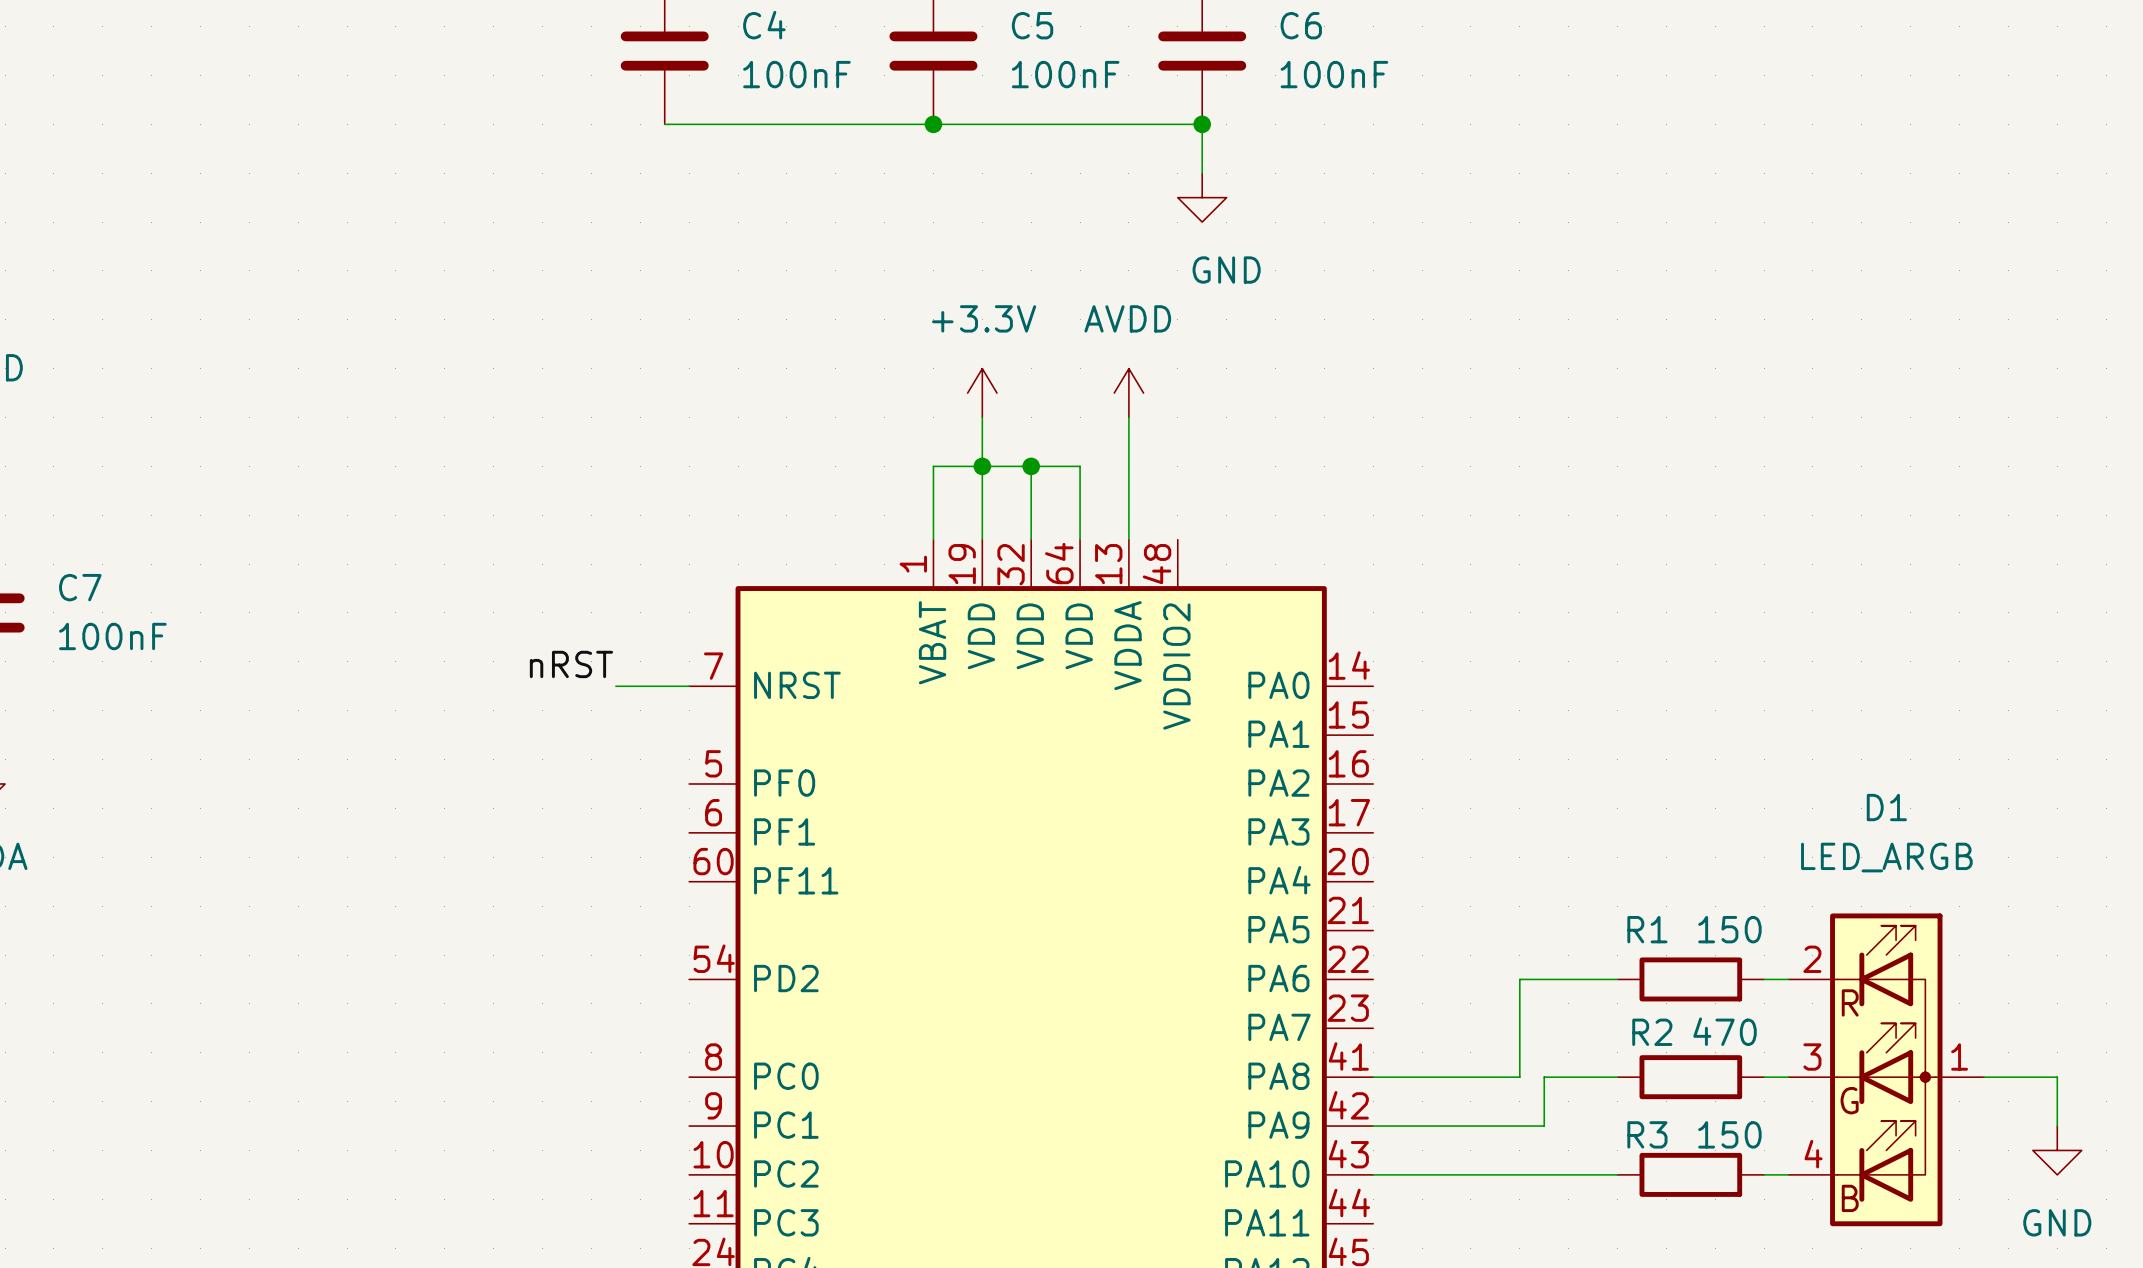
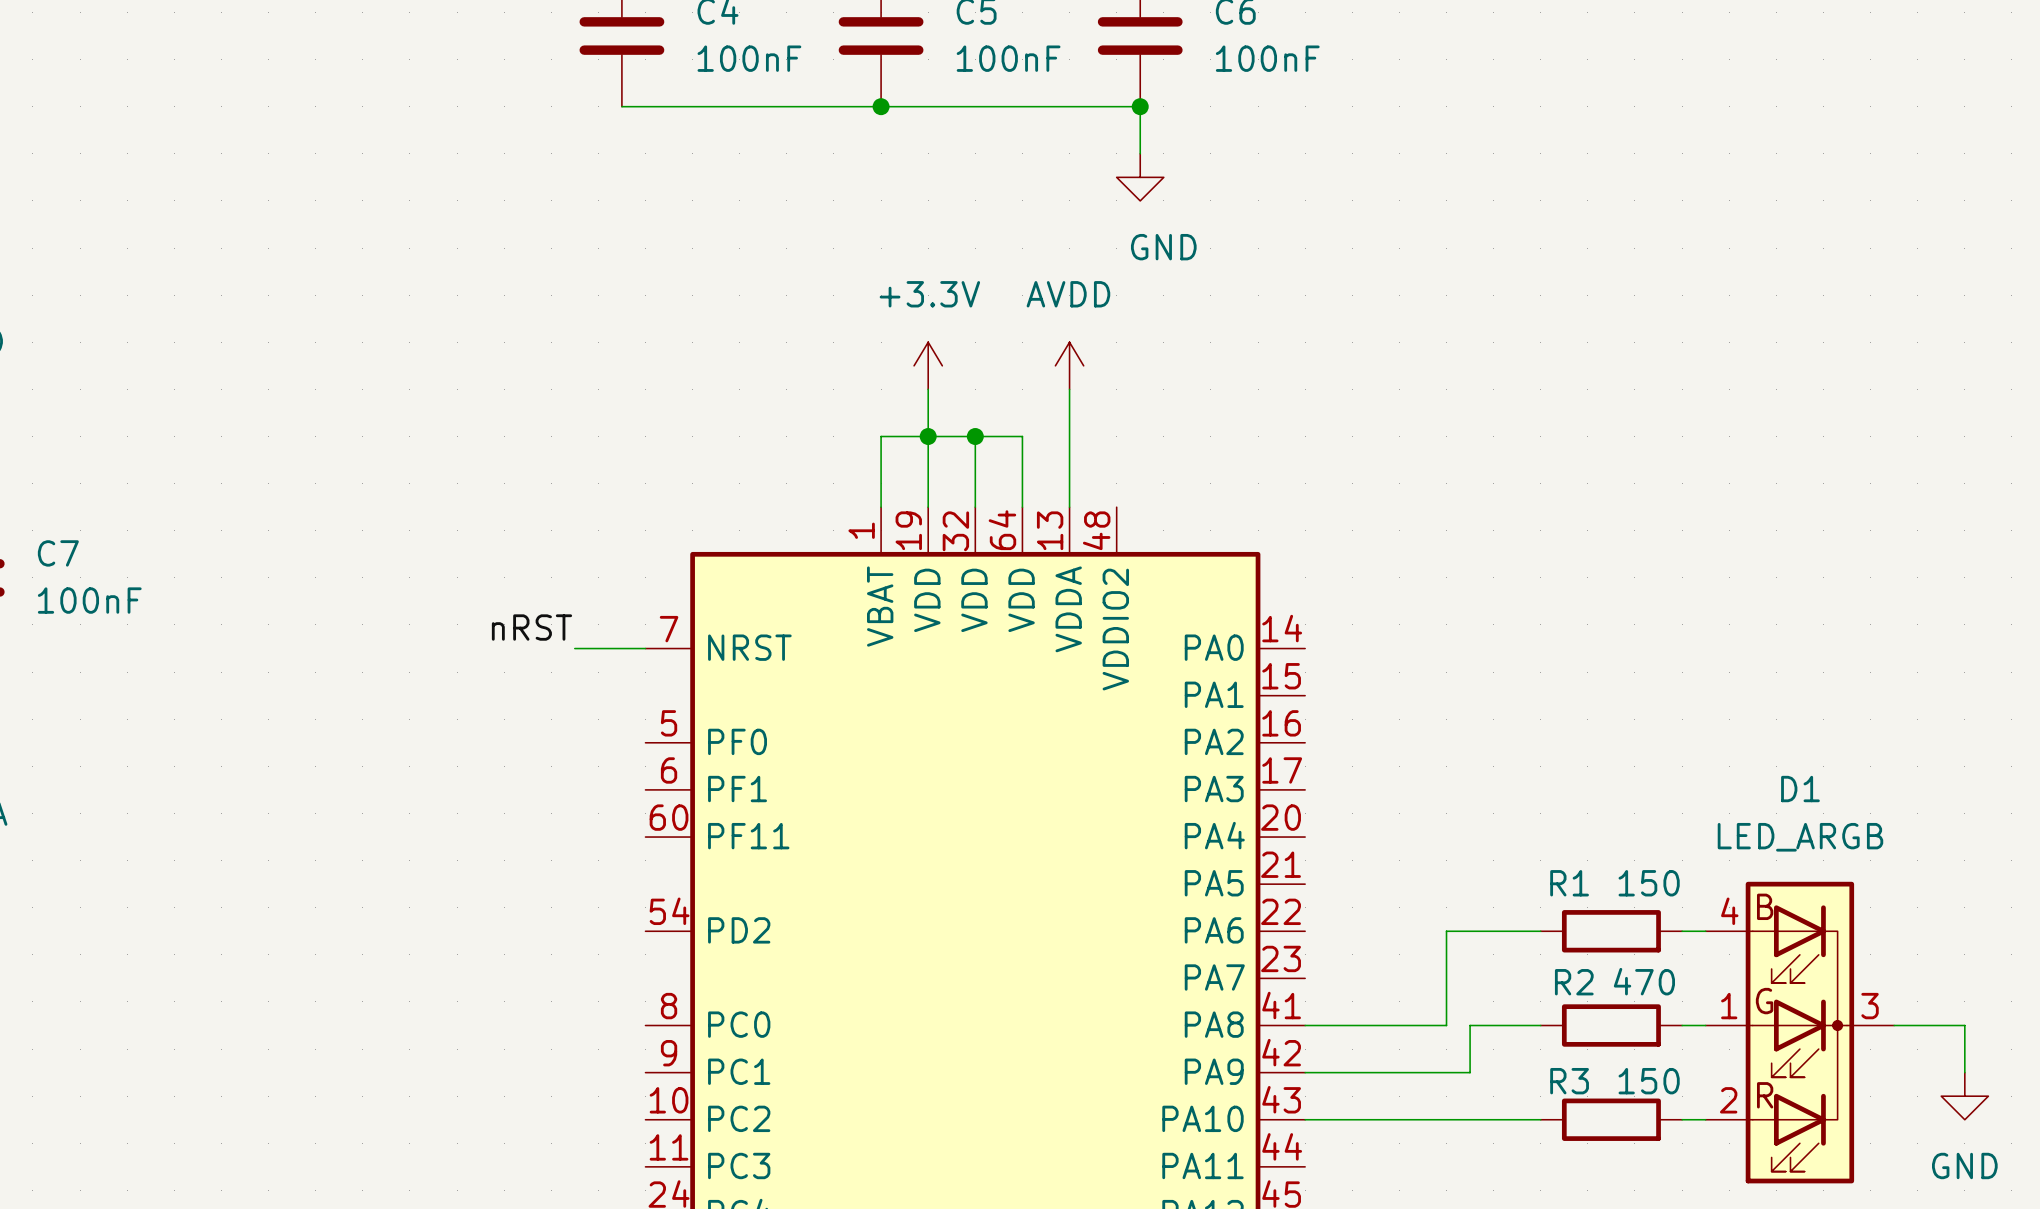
D1 symbol: [1788, 913, 1985, 1227] -> [1705, 881, 1895, 1184]

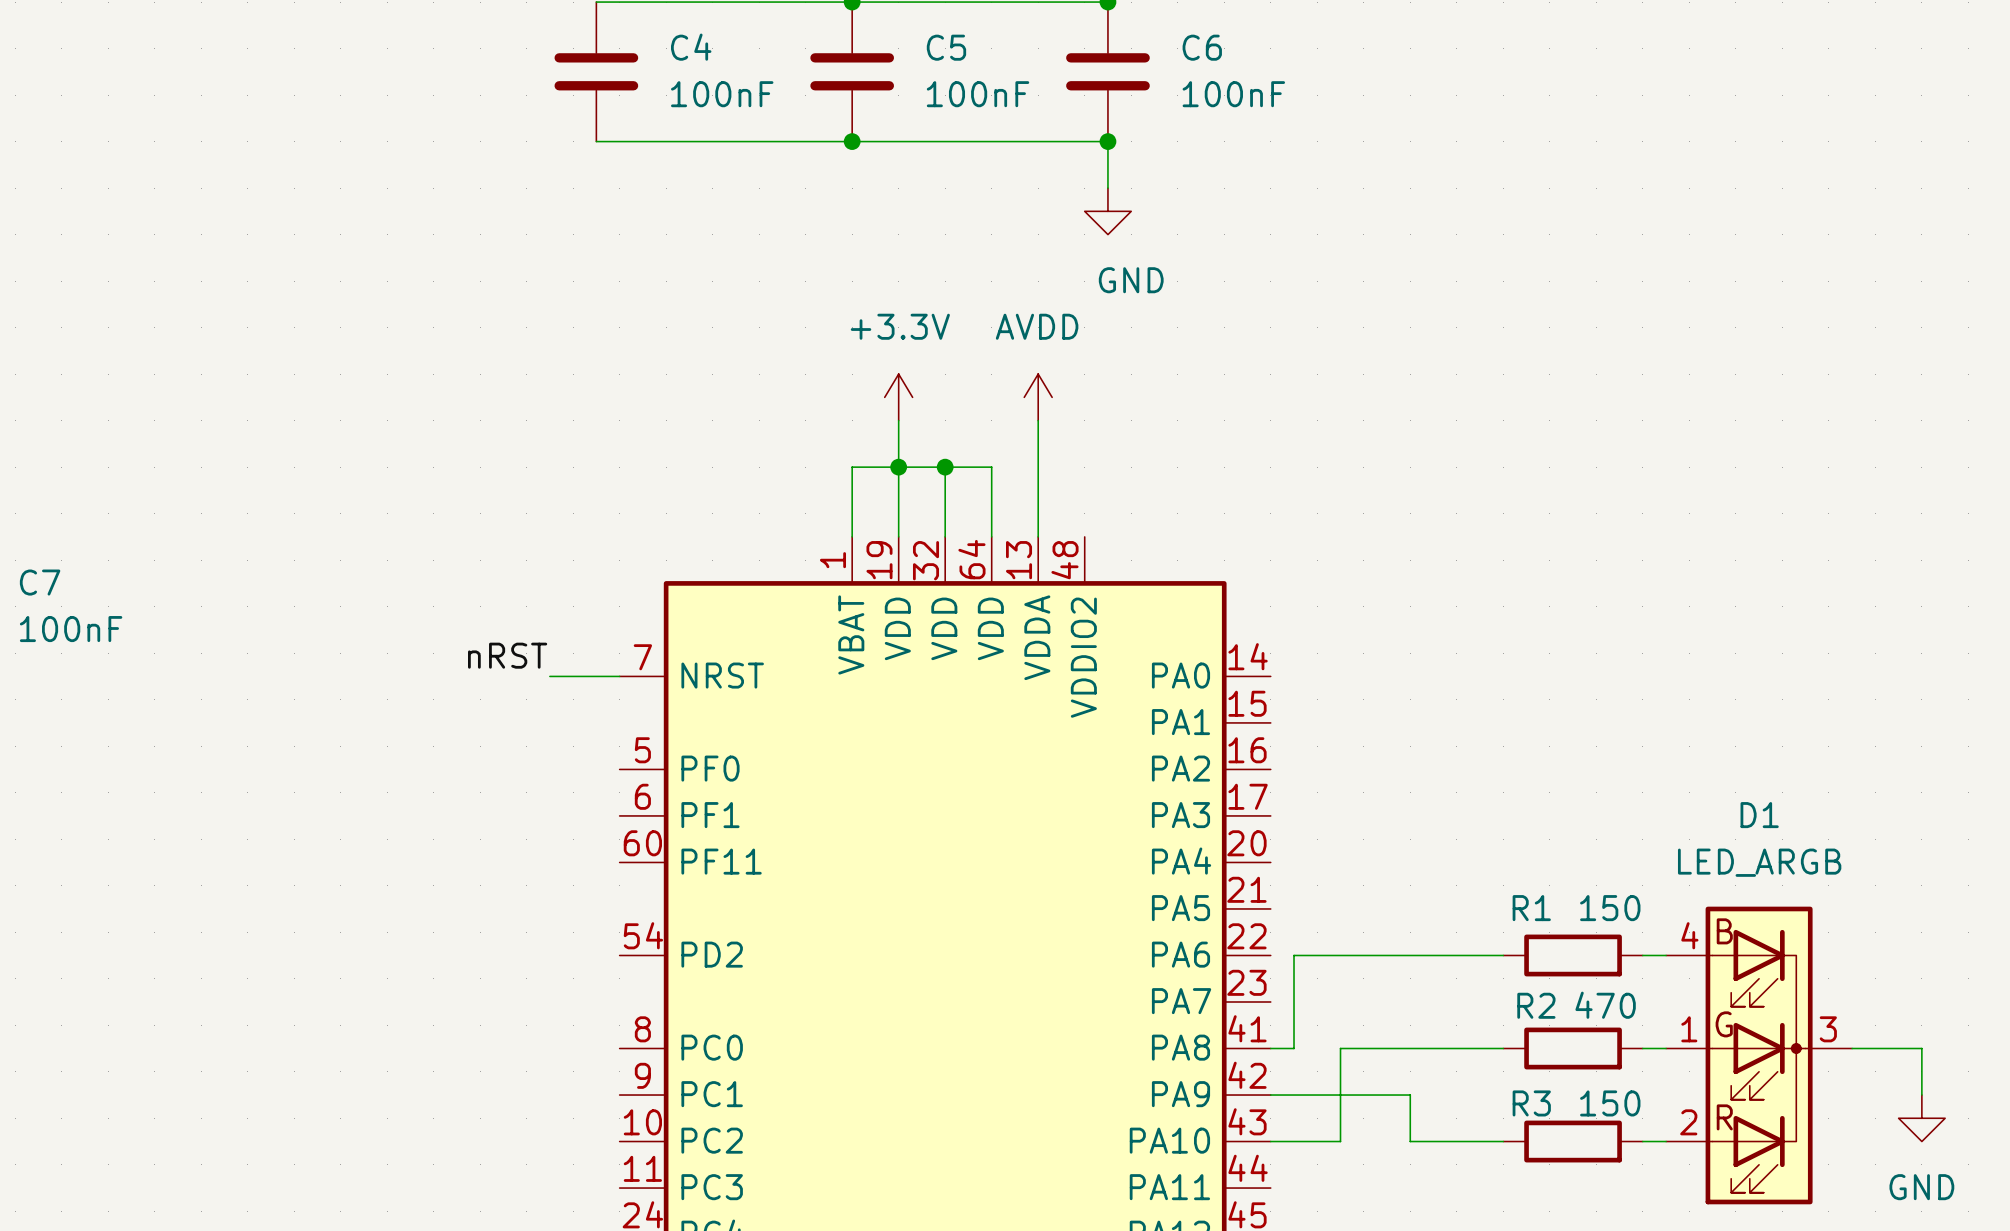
wire: (1446, 931) (1446, 1025) -> (1410, 955) (1294, 955) (1294, 1048)
wire: (1328, 1025) (1375, 1025) -> (1340, 1141) (1340, 1048)
wire: (1470, 1025) (1470, 1072) (1446, 1072) -> (1433, 1048) (1410, 1048)
wire: (1375, 1119) (1446, 1119) -> (1410, 1095) (1410, 1141)

